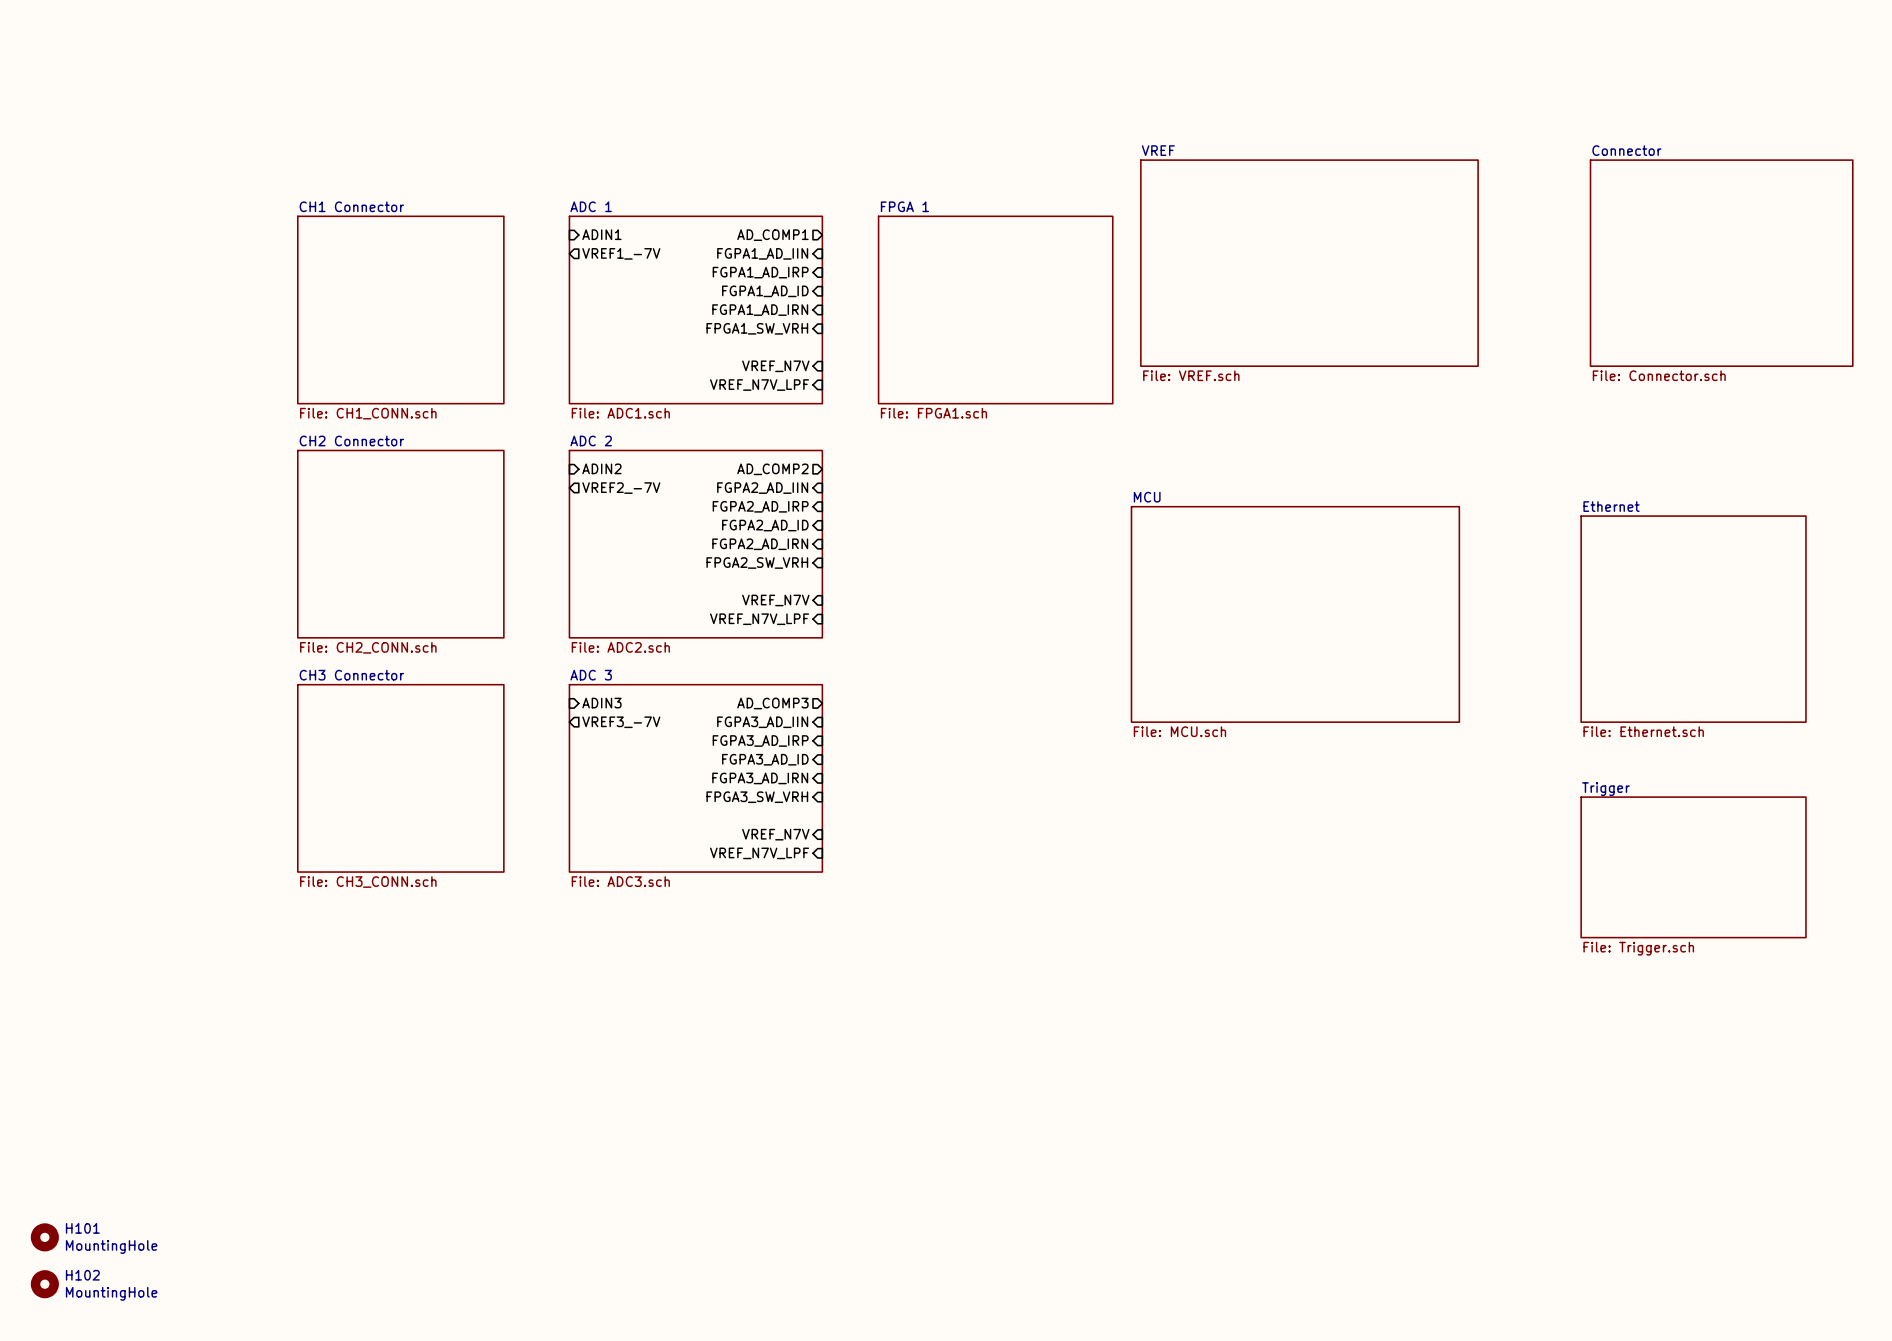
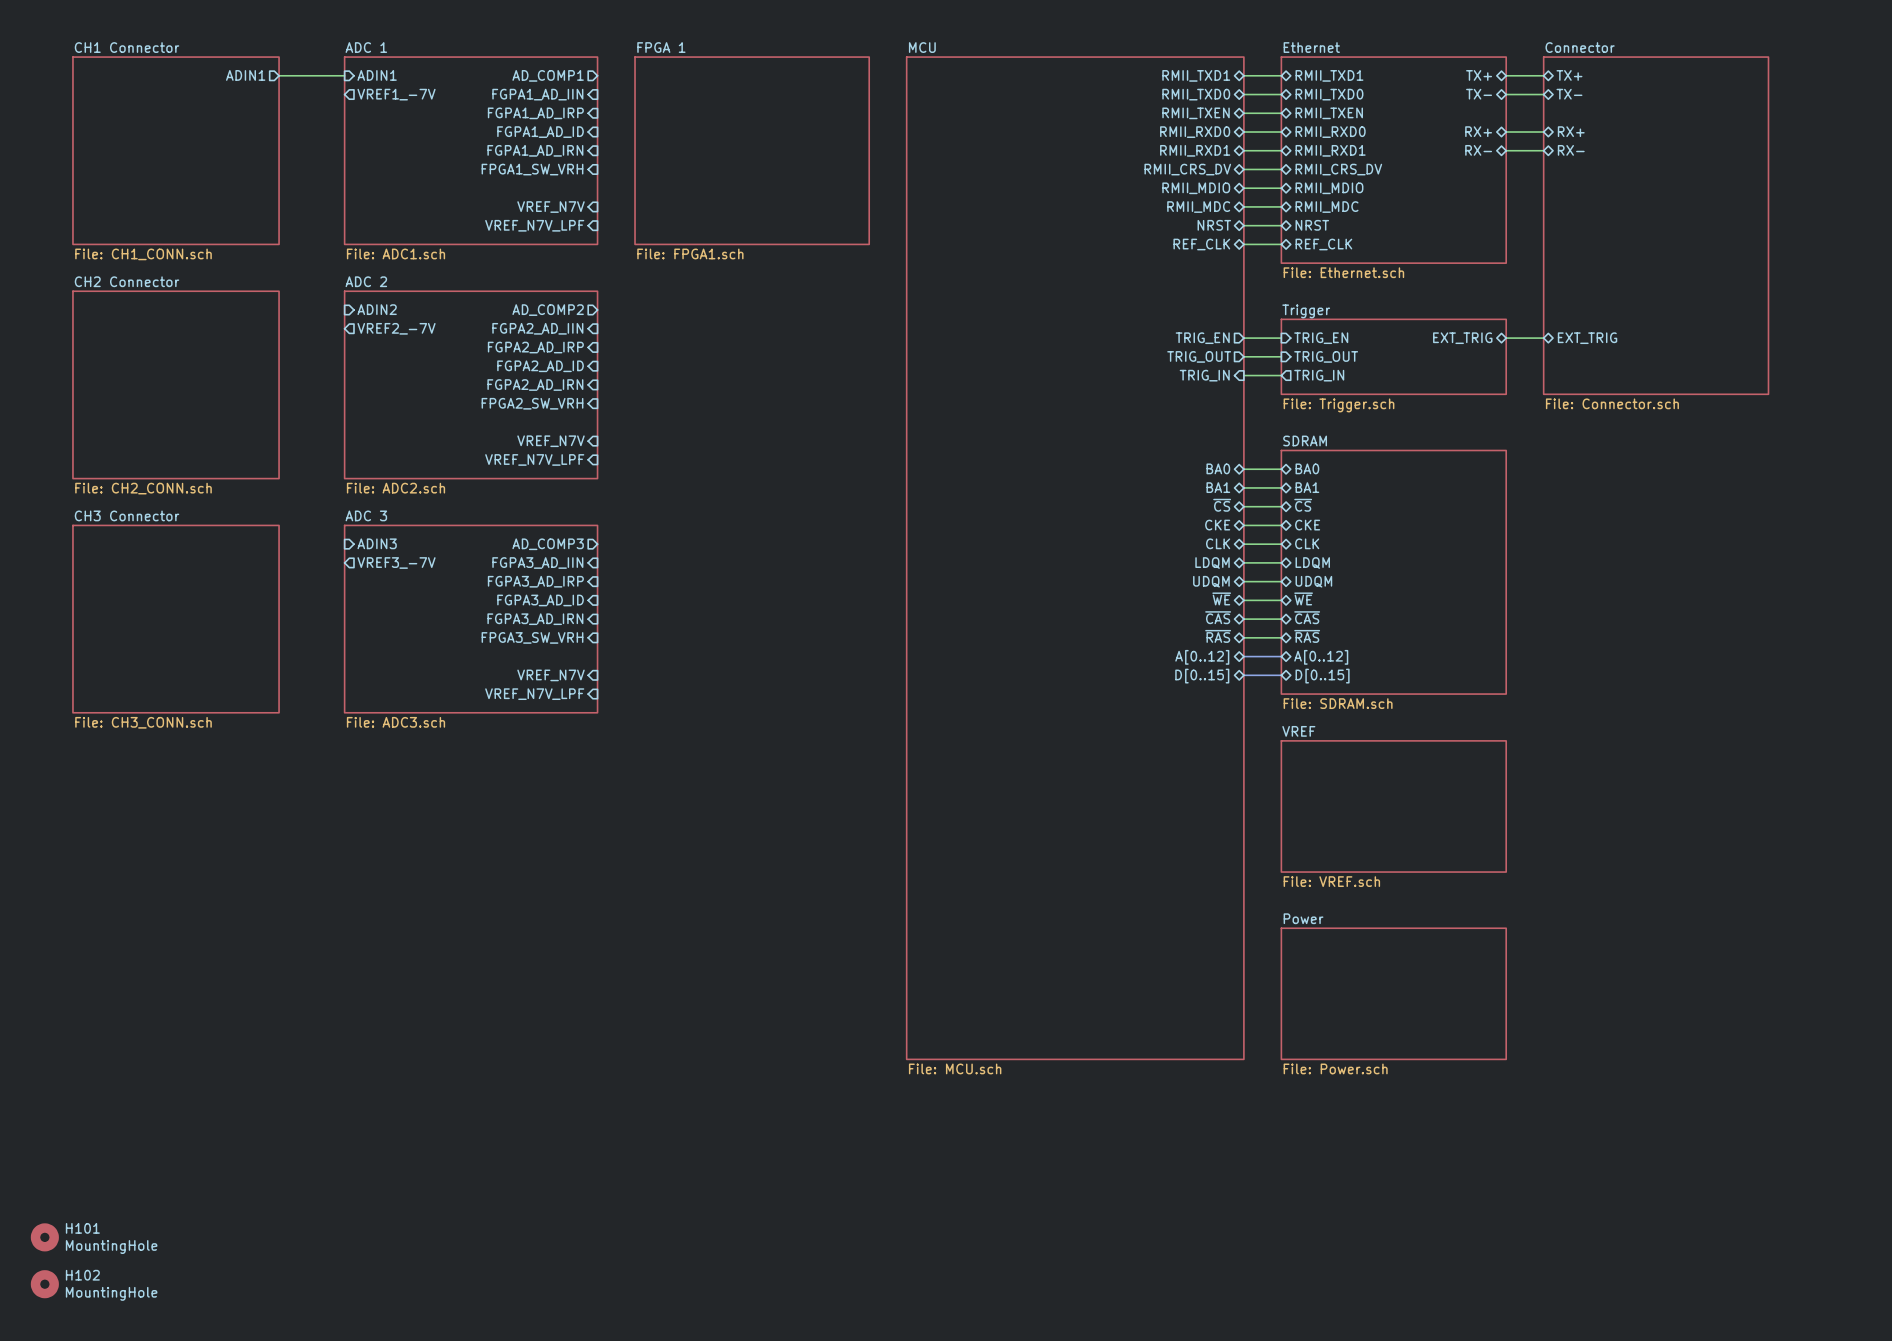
sheet pin: none -> ADIN1 (245, 75)
wire: none -> (279, 75) (344, 75)
sheet pin: none -> ADIN1 (377, 75)
sheet pin: none -> AD_COMP1 (548, 75)
sheet pin: none -> RMII_TXD1 (1196, 75)
wire: none -> (1243, 75) (1281, 75)
sheet pin: none -> RMII_TXD1 (1329, 75)
sheet pin: none -> TX+ (1479, 75)
wire: none -> (1506, 75) (1543, 75)
sheet pin: none -> TX+ (1569, 75)
sheet pin: none -> VREF1_-7V (396, 94)
sheet pin: none -> FGPA1_AD_IIN (537, 94)
sheet pin: none -> RMII_TXD0 (1196, 94)
wire: none -> (1243, 94) (1281, 94)
sheet pin: none -> RMII_TXD0 (1329, 94)
sheet pin: none -> TX- (1479, 94)
wire: none -> (1506, 94) (1543, 94)
sheet pin: none -> TX- (1569, 94)
sheet pin: none -> FGPA1_AD_IRP (535, 113)
sheet pin: none -> RMII_TXEN (1196, 113)
wire: none -> (1243, 113) (1281, 113)
sheet pin: none -> RMII_TXEN (1329, 113)
sheet pin: none -> RX+ (1478, 131)
sheet pin: none -> RX+ (1571, 131)
sheet pin: none -> FGPA1_AD_ID (540, 132)
sheet pin: none -> RMII_RXD0 (1195, 132)
wire: none -> (1243, 132) (1281, 132)
sheet pin: none -> RMII_RXD0 (1330, 132)
wire: none -> (1506, 132) (1543, 132)
sheet pin: none -> FGPA1_AD_IRN (535, 150)
sheet pin: none -> RMII_RXD1 (1195, 150)
wire: none -> (1243, 150) (1281, 150)
sheet pin: none -> RMII_RXD1 (1330, 150)
sheet pin: none -> RX- (1478, 150)
wire: none -> (1506, 150) (1543, 150)
sheet pin: none -> RX- (1571, 150)
sheet Ethernet: none -> File: Ethernet.sch (1393, 160)
sheet pin: none -> FPGA1_SW_VRH (532, 169)
sheet pin: none -> RMII_CRS_DV (1187, 169)
wire: none -> (1243, 169) (1281, 169)
sheet pin: none -> RMII_CRS_DV (1338, 169)
sheet pin: none -> RMII_MDIO (1196, 188)
wire: none -> (1243, 188) (1281, 188)
sheet pin: none -> RMII_MDIO (1329, 188)
wire: none -> (1243, 206) (1281, 206)
sheet pin: none -> VREF_N7V (551, 207)
sheet pin: none -> RMII_MDC (1198, 207)
sheet pin: none -> RMII_MDC (1327, 207)
sheet pin: none -> VREF_N7V_LPF (534, 225)
sheet pin: none -> NRST (1214, 225)
wire: none -> (1243, 225) (1281, 225)
sheet pin: none -> NRST (1312, 225)
sheet Connector: none -> File: Connector.sch (1656, 225)
sheet pin: ADIN1 (601, 234) -> none
sheet pin: AD_COMP1 (772, 235) -> none
sheet pin: none -> REF_CLK (1201, 244)
wire: none -> (1243, 244) (1281, 244)
sheet pin: none -> REF_CLK (1323, 244)
sheet pin: VREF1_-7V (621, 253) -> none
sheet pin: FGPA1_AD_IIN (762, 253) -> none
sheet VREF: File: VREF.sch (1309, 263) -> none
sheet Connector: File: Connector.sch (1721, 263) -> none
sheet pin: FGPA1_AD_IRP (760, 272) -> none
sheet pin: FGPA1_AD_ID (765, 291) -> none
sheet pin: none -> ADIN2 (377, 309)
sheet CH1 Connector position: (400, 309) -> (176, 150)
sheet ADC 1 position: (695, 309) -> (471, 150)
sheet FPGA 1 position: (995, 309) -> (752, 150)
sheet pin: none -> AD_COMP2 (548, 310)
sheet pin: FGPA1_AD_IRN (760, 310) -> none
sheet pin: none -> VREF2_-7V (396, 328)
sheet pin: none -> FGPA2_AD_IIN (537, 328)
sheet pin: FPGA1_SW_VRH (757, 328) -> none
sheet pin: none -> TRIG_EN (1202, 338)
wire: none -> (1243, 338) (1281, 338)
sheet pin: none -> TRIG_EN (1321, 338)
sheet pin: none -> EXT_TRIG (1462, 338)
wire: none -> (1506, 338) (1543, 338)
sheet pin: none -> EXT_TRIG (1587, 338)
sheet pin: none -> FGPA2_AD_IRP (535, 347)
sheet pin: none -> TRIG_OUT (1199, 356)
wire: none -> (1243, 356) (1281, 356)
sheet pin: none -> TRIG_OUT (1326, 356)
sheet Trigger: none -> File: Trigger.sch (1393, 356)
sheet pin: none -> FGPA2_AD_ID (540, 366)
sheet pin: VREF_N7V (775, 366) -> none
sheet pin: none -> TRIG_IN (1204, 375)
wire: none -> (1243, 375) (1281, 375)
sheet pin: none -> TRIG_IN (1319, 375)
sheet pin: none -> FGPA2_AD_IRN (535, 385)
sheet pin: VREF_N7V_LPF (759, 385) -> none
sheet pin: none -> FPGA2_SW_VRH (532, 403)
sheet pin: none -> VREF_N7V (551, 441)
sheet pin: none -> VREF_N7V_LPF (534, 459)
sheet pin: ADIN2 (601, 468) -> none
sheet pin: none -> BA0 (1218, 468)
sheet pin: none -> BA0 (1307, 468)
sheet pin: AD_COMP2 (772, 469) -> none
wire: none -> (1243, 469) (1281, 469)
sheet pin: none -> BA1 (1218, 487)
wire: none -> (1243, 487) (1281, 487)
sheet pin: none -> BA1 (1307, 487)
sheet pin: VREF2_-7V (621, 488) -> none
sheet pin: FGPA2_AD_IIN (762, 488) -> none
sheet pin: none -> ~{CS} (1222, 505)
sheet pin: none -> ~{CS} (1303, 505)
sheet pin: FGPA2_AD_IRP (760, 506) -> none
sheet pin: FGPA2_AD_ID (765, 525) -> none
sheet pin: none -> CKE (1217, 525)
wire: none -> (1243, 525) (1281, 525)
sheet pin: none -> CKE (1307, 525)
sheet pin: none -> ADIN3 (377, 543)
sheet pin: none -> CLK (1218, 543)
sheet pin: none -> CLK (1307, 543)
sheet CH2 Connector position: (400, 544) -> (176, 384)
sheet pin: none -> AD_COMP3 (548, 544)
sheet ADC 2 position: (695, 544) -> (471, 384)
sheet pin: FGPA2_AD_IRN (760, 544) -> none
wire: none -> (1243, 544) (1281, 544)
sheet MCU: none -> File: MCU.sch (1075, 558)
wire: none -> (1243, 562) (1281, 562)
sheet pin: none -> VREF3_-7V (396, 563)
sheet pin: none -> FGPA3_AD_IIN (537, 563)
sheet pin: FPGA2_SW_VRH (757, 563) -> none
sheet pin: none -> LDQM (1212, 563)
sheet pin: none -> LDQM (1312, 563)
sheet SDRAM: none -> File: SDRAM.sch (1393, 572)
sheet pin: none -> FGPA3_AD_IRP (535, 581)
sheet pin: none -> UDQM (1211, 581)
wire: none -> (1243, 581) (1281, 581)
sheet pin: none -> UDQM (1313, 581)
sheet pin: none -> ~{WE} (1221, 598)
sheet pin: none -> ~{WE} (1303, 598)
sheet pin: none -> FGPA3_AD_ID (540, 600)
sheet pin: VREF_N7V (775, 600) -> none
wire: none -> (1243, 600) (1281, 600)
sheet MCU: File: MCU.sch (1295, 614) -> none
sheet pin: none -> ~{CAS} (1218, 617)
sheet pin: none -> ~{CAS} (1307, 617)
sheet pin: none -> FGPA3_AD_IRN (535, 619)
sheet pin: VREF_N7V_LPF (759, 619) -> none
wire: none -> (1243, 619) (1281, 619)
sheet Ethernet: File: Ethernet.sch (1693, 619) -> none
sheet pin: none -> ~{RAS} (1218, 636)
sheet pin: none -> ~{RAS} (1307, 636)
sheet pin: none -> FPGA3_SW_VRH (532, 637)
wire: none -> (1243, 637) (1281, 637)
bus: none -> (1243, 656) (1281, 656)
sheet pin: none -> A[0..12] (1202, 657)
sheet pin: none -> A[0..12] (1321, 657)
sheet pin: none -> VREF_N7V (551, 675)
bus: none -> (1243, 675) (1281, 675)
sheet pin: none -> D[0..15] (1202, 676)
sheet pin: none -> D[0..15] (1322, 676)
sheet pin: none -> VREF_N7V_LPF (534, 694)
sheet pin: ADIN3 (601, 703) -> none
sheet pin: AD_COMP3 (772, 703) -> none
sheet pin: VREF3_-7V (621, 722) -> none
sheet pin: FGPA3_AD_IIN (762, 722) -> none
sheet pin: FGPA3_AD_IRP (760, 740) -> none
sheet pin: FGPA3_AD_ID (765, 759) -> none
sheet CH3 Connector position: (400, 778) -> (176, 619)
sheet ADC 3 position: (695, 778) -> (471, 619)
sheet pin: FGPA3_AD_IRN (760, 778) -> none
sheet pin: FPGA3_SW_VRH (757, 797) -> none
sheet VREF: none -> File: VREF.sch (1393, 806)
sheet pin: VREF_N7V (775, 834) -> none
sheet pin: VREF_N7V_LPF (759, 853) -> none
sheet Trigger: File: Trigger.sch (1693, 867) -> none
sheet Power: none -> File: Power.sch (1393, 993)

